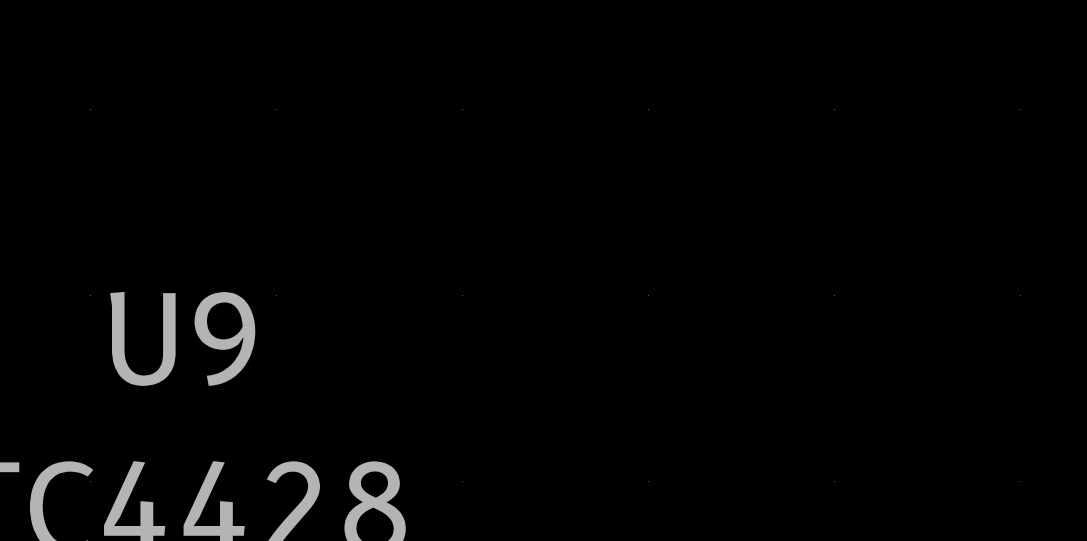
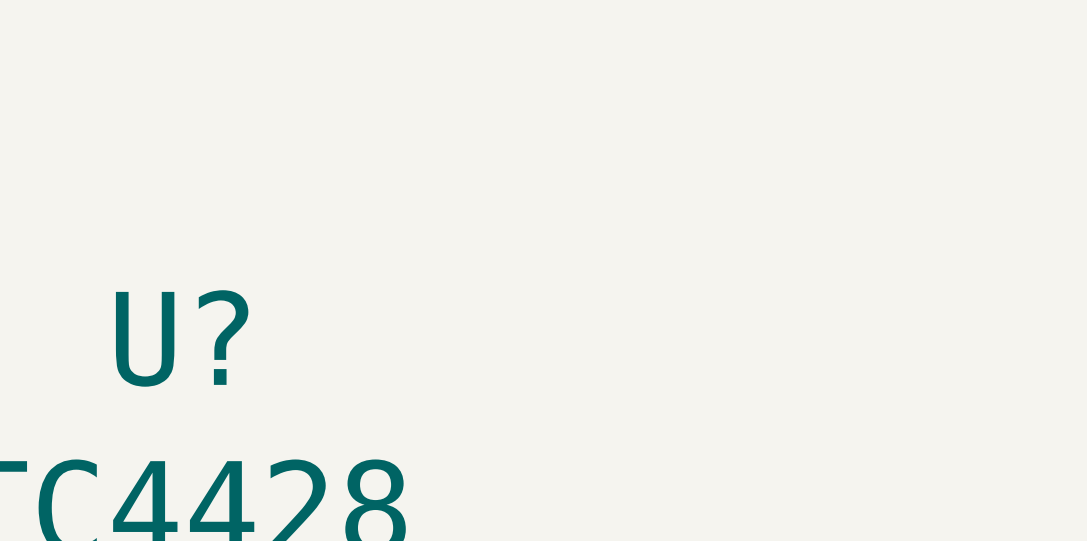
U9 name: U9 (182, 338) -> U? (182, 338)

